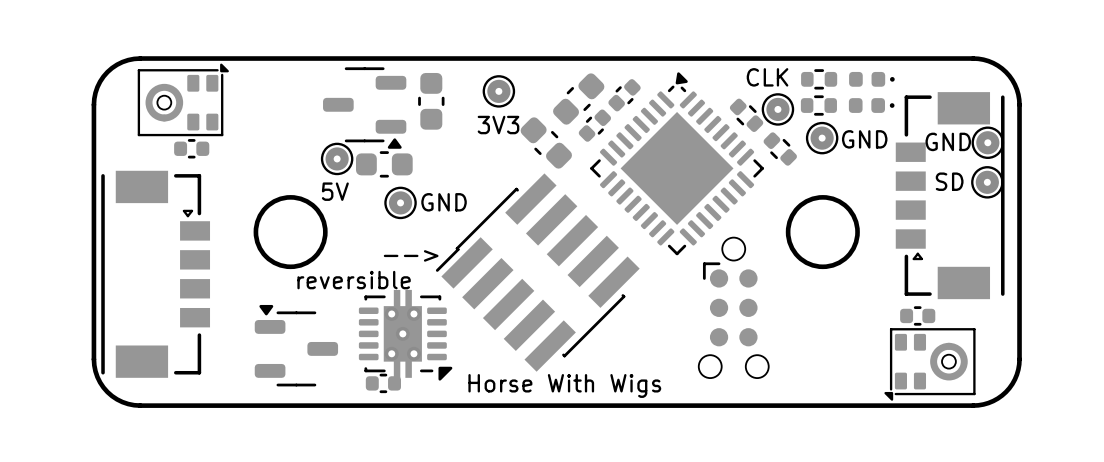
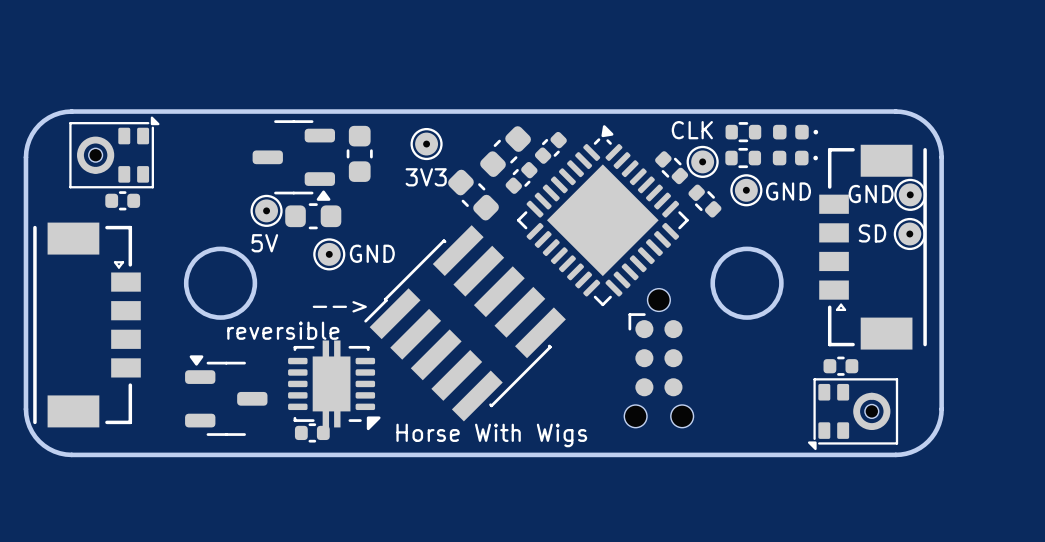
part footprint: [358, 289, 453, 381] -> [288, 340, 381, 431]

